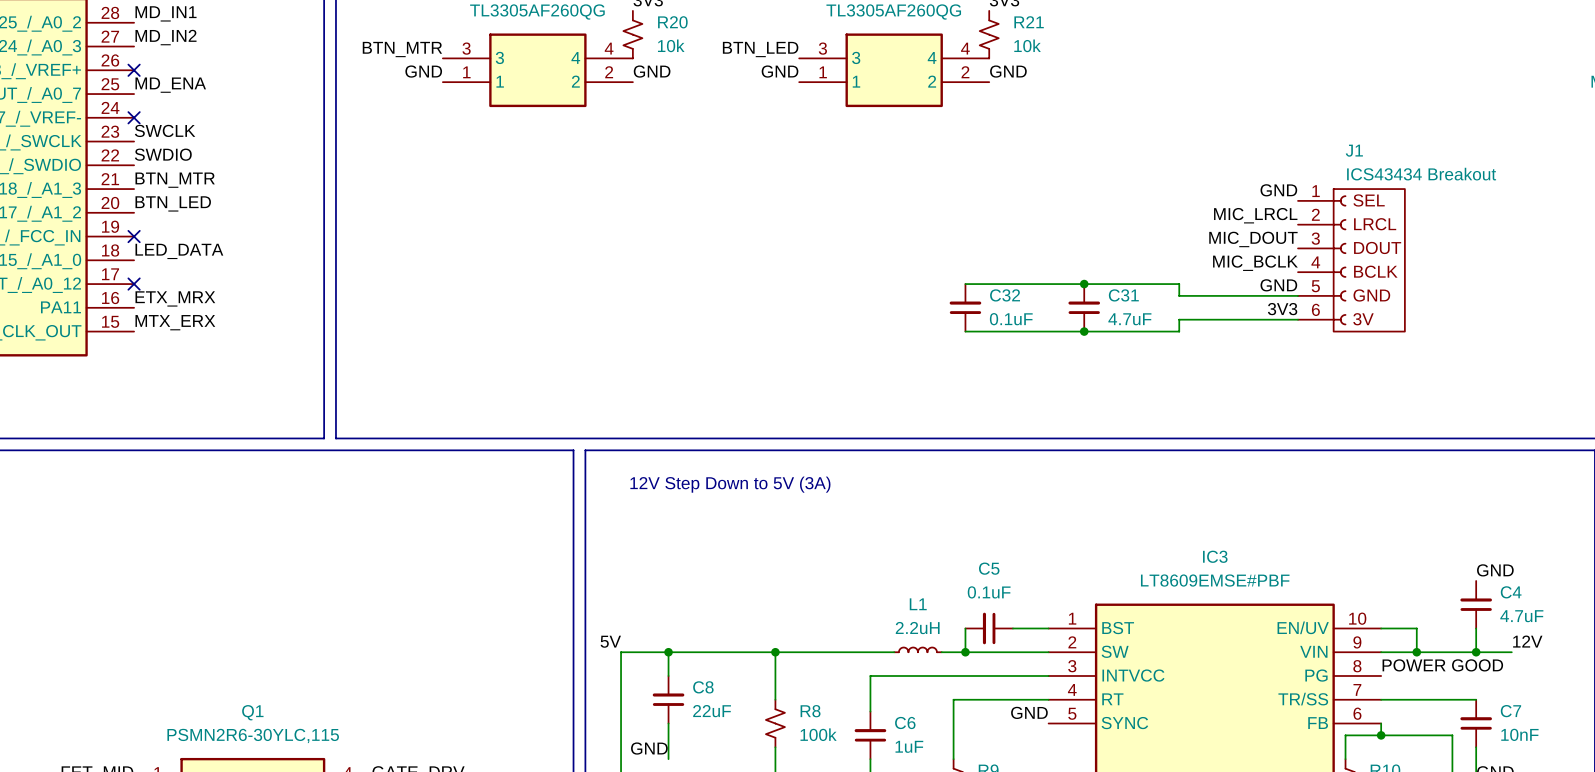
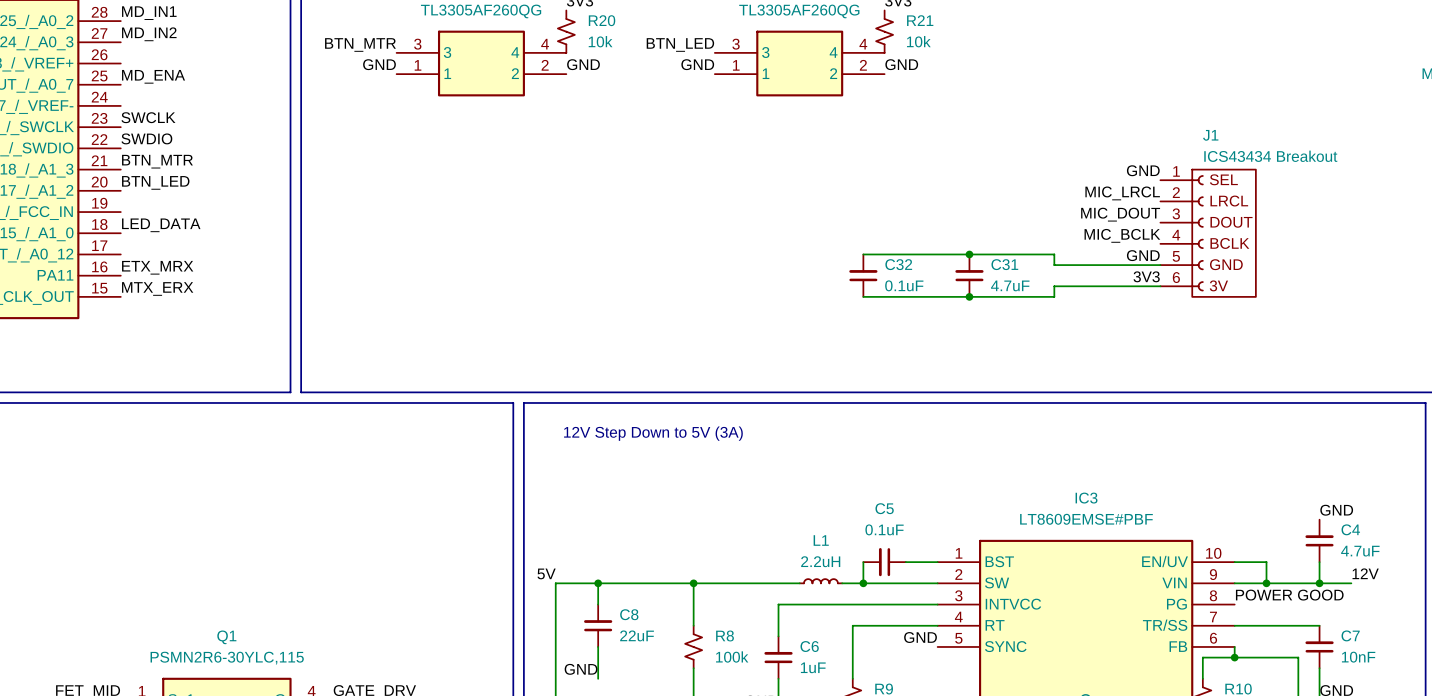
no-connect mark: (134, 70) -> none
no-connect mark: (134, 117) -> none
no-connect mark: (134, 236) -> none
no-connect mark: (134, 284) -> none

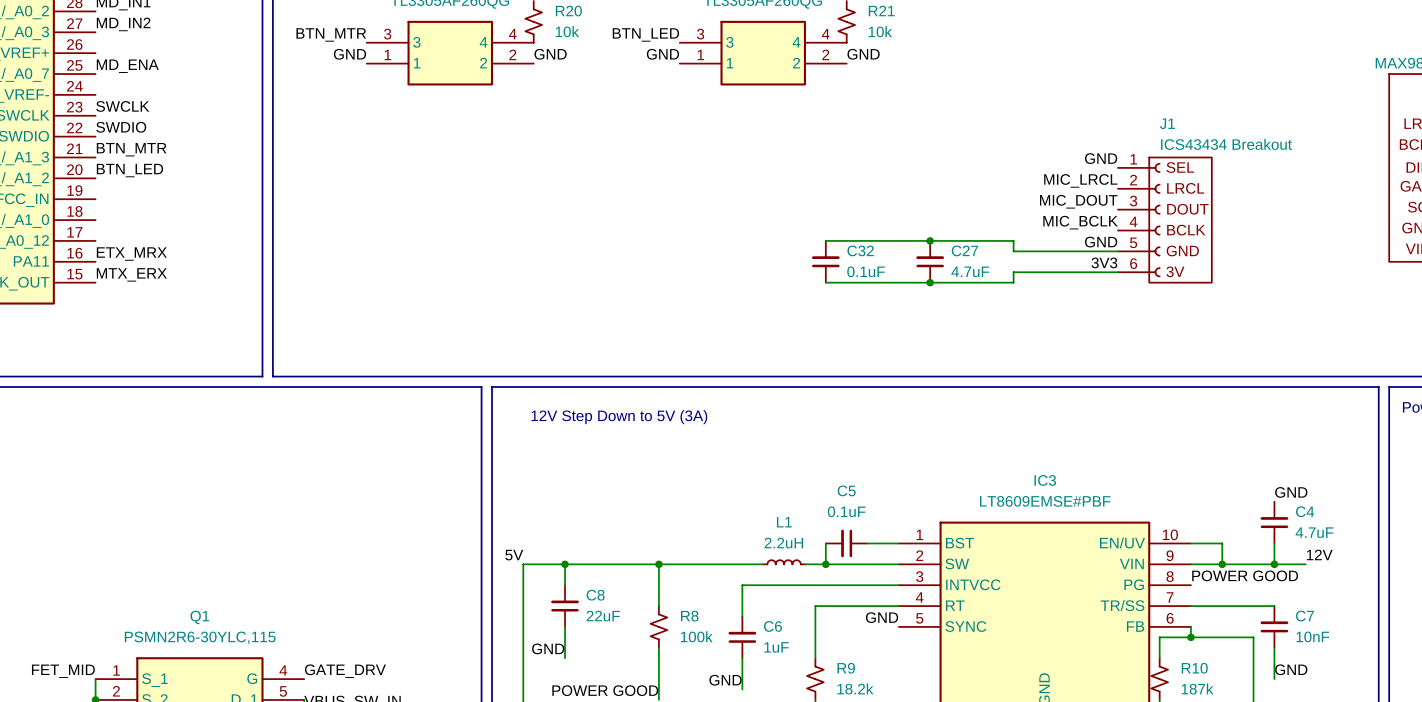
label: LED_DATA (161, 225) -> none
C31 name: C31 (1004, 264) -> C27 (964, 250)

